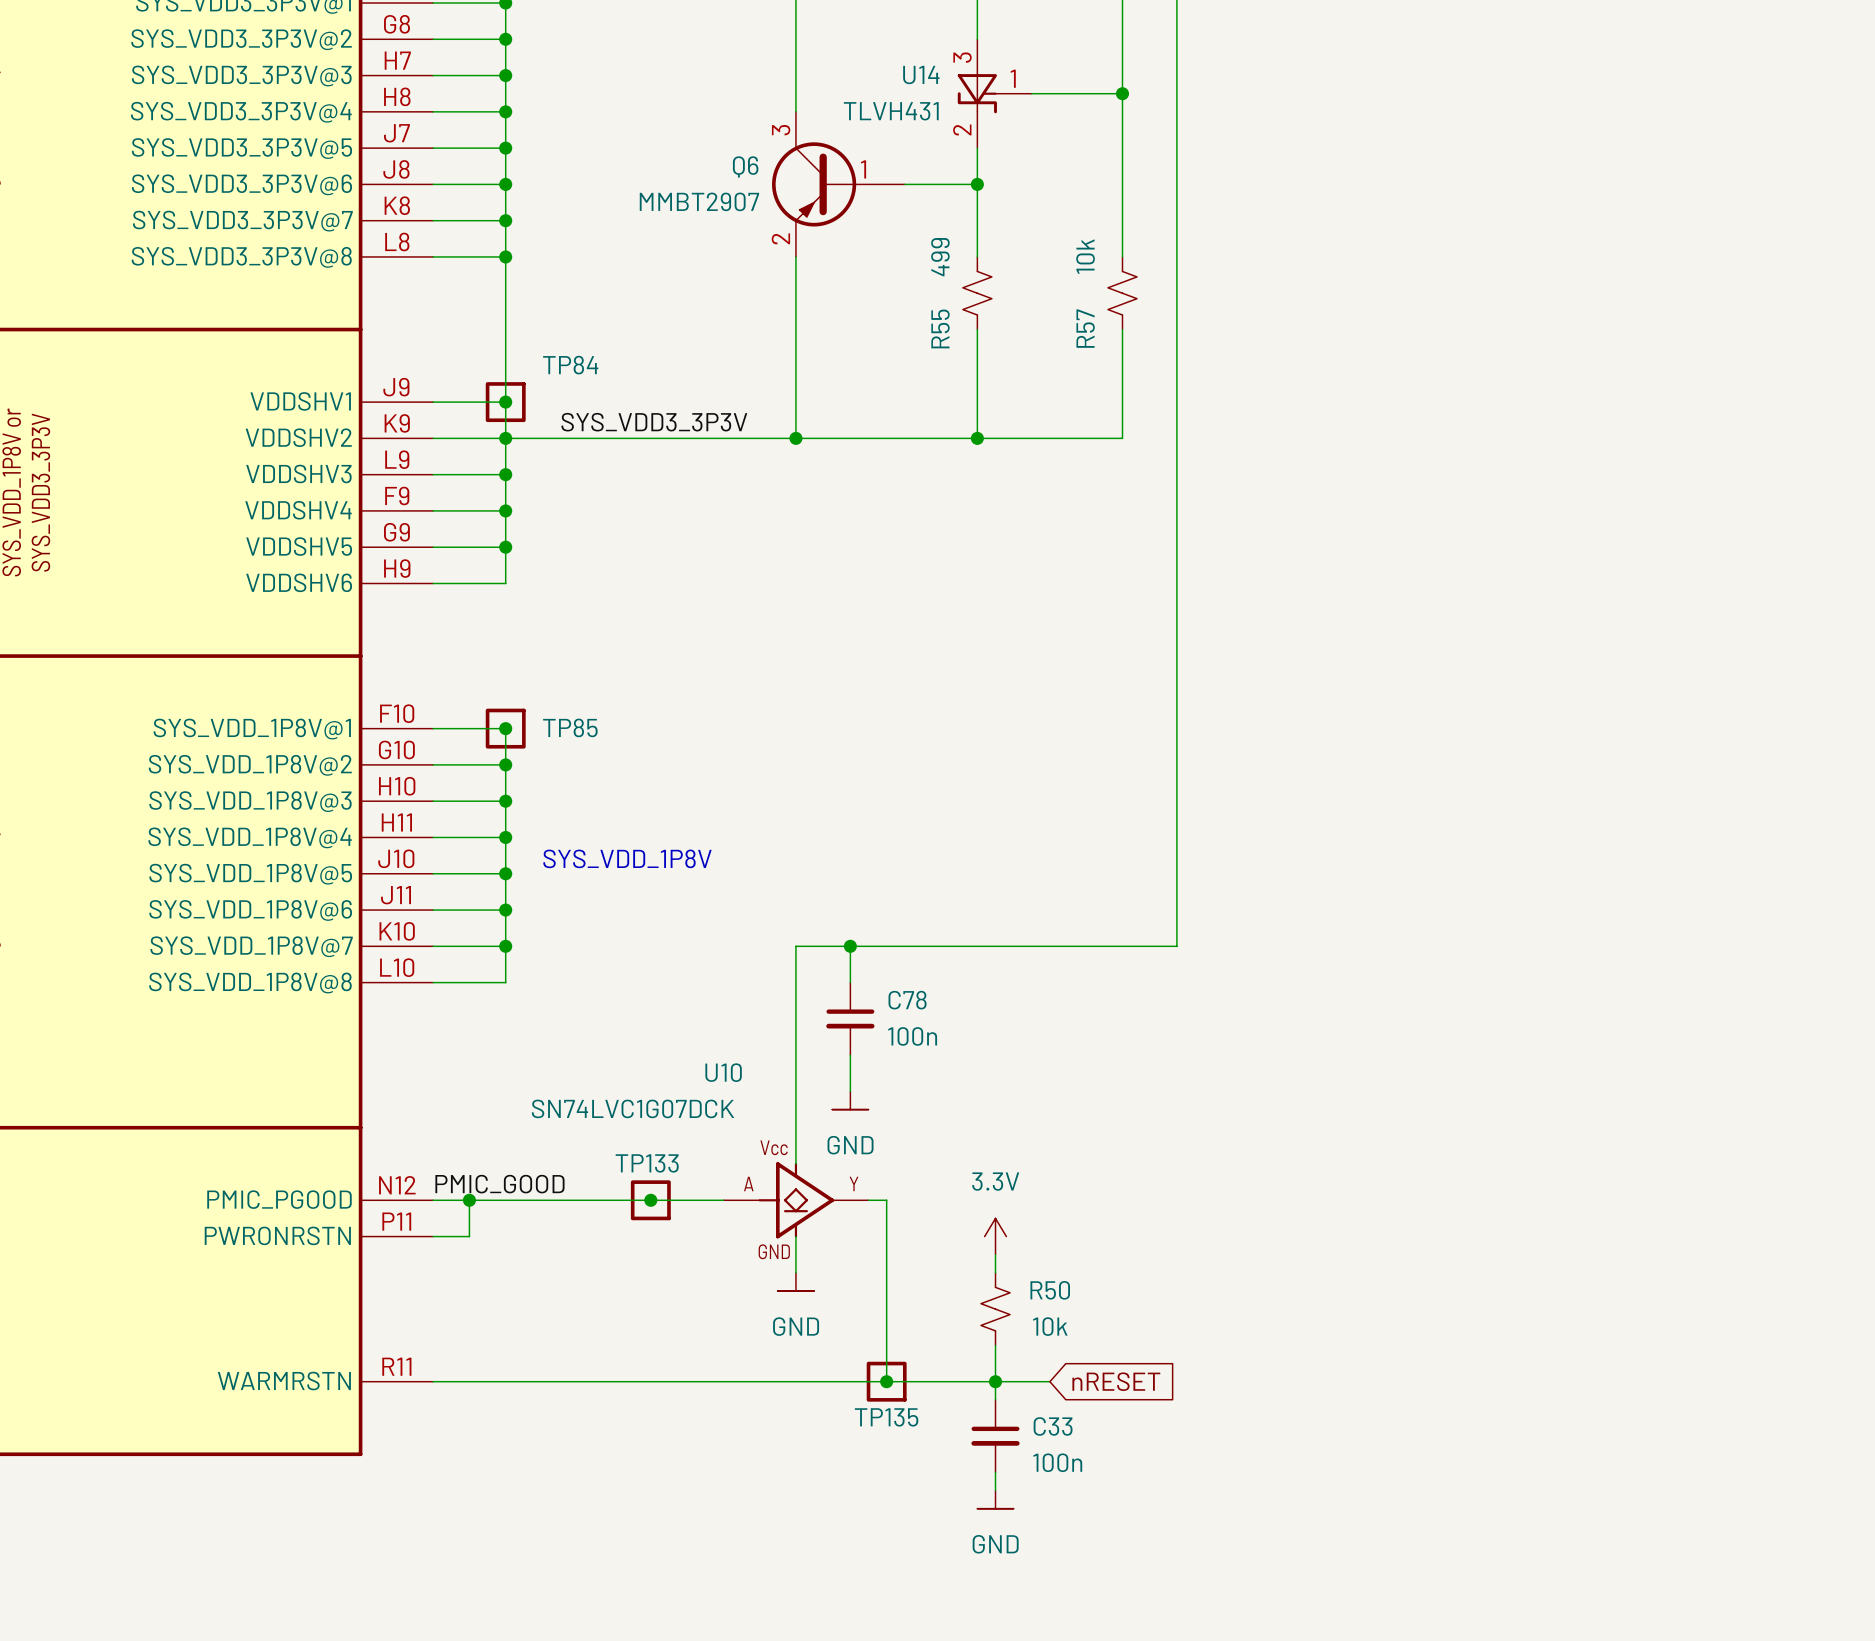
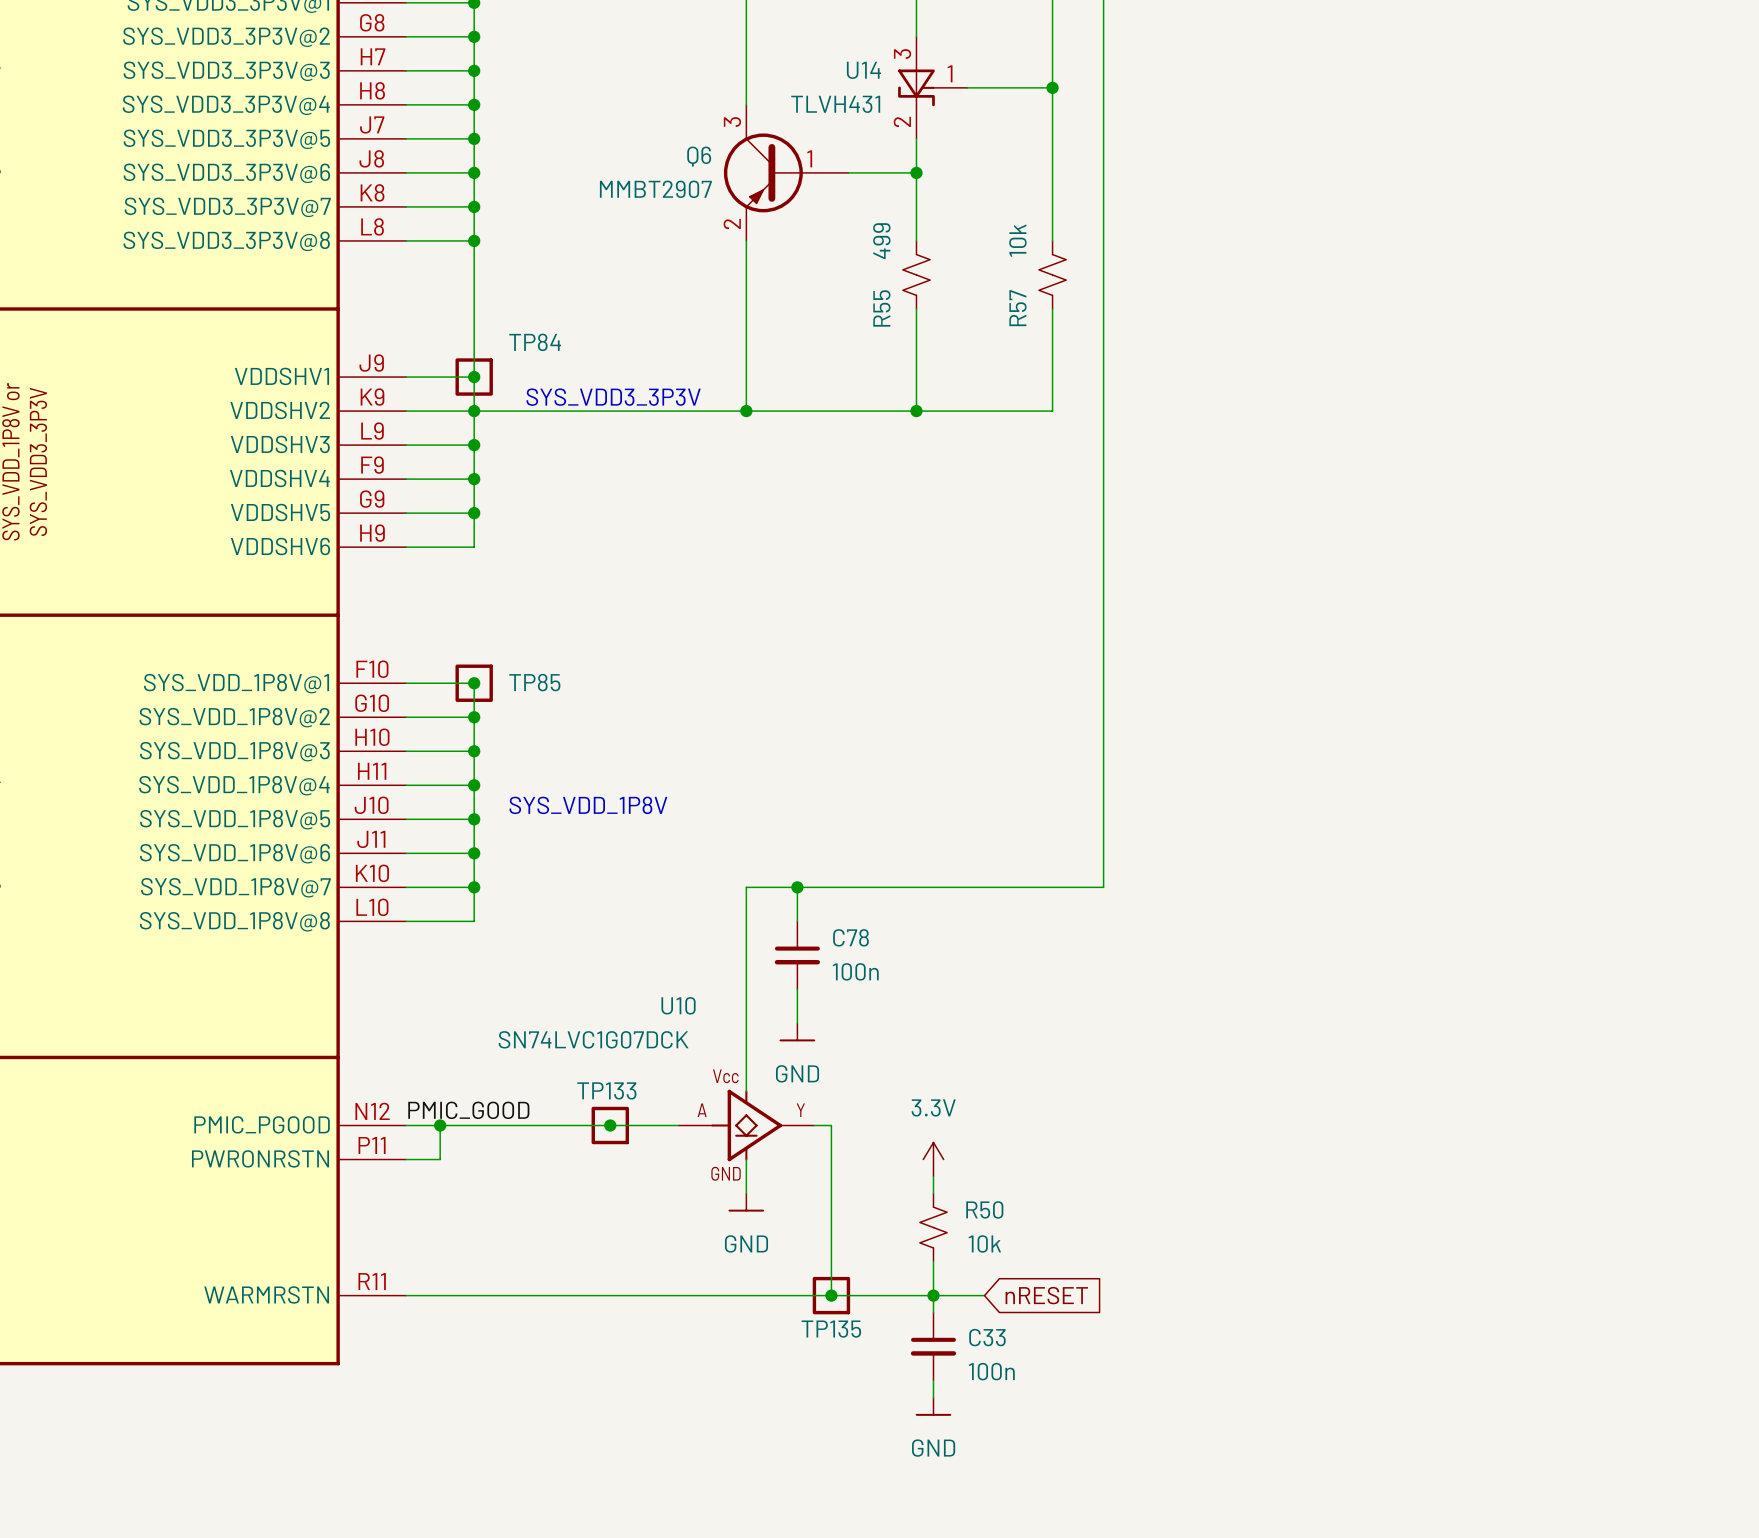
label: SYS_VDD3_3P3V (654, 422) -> none
text: none -> SYS_VDD3_3P3V (613, 397)

